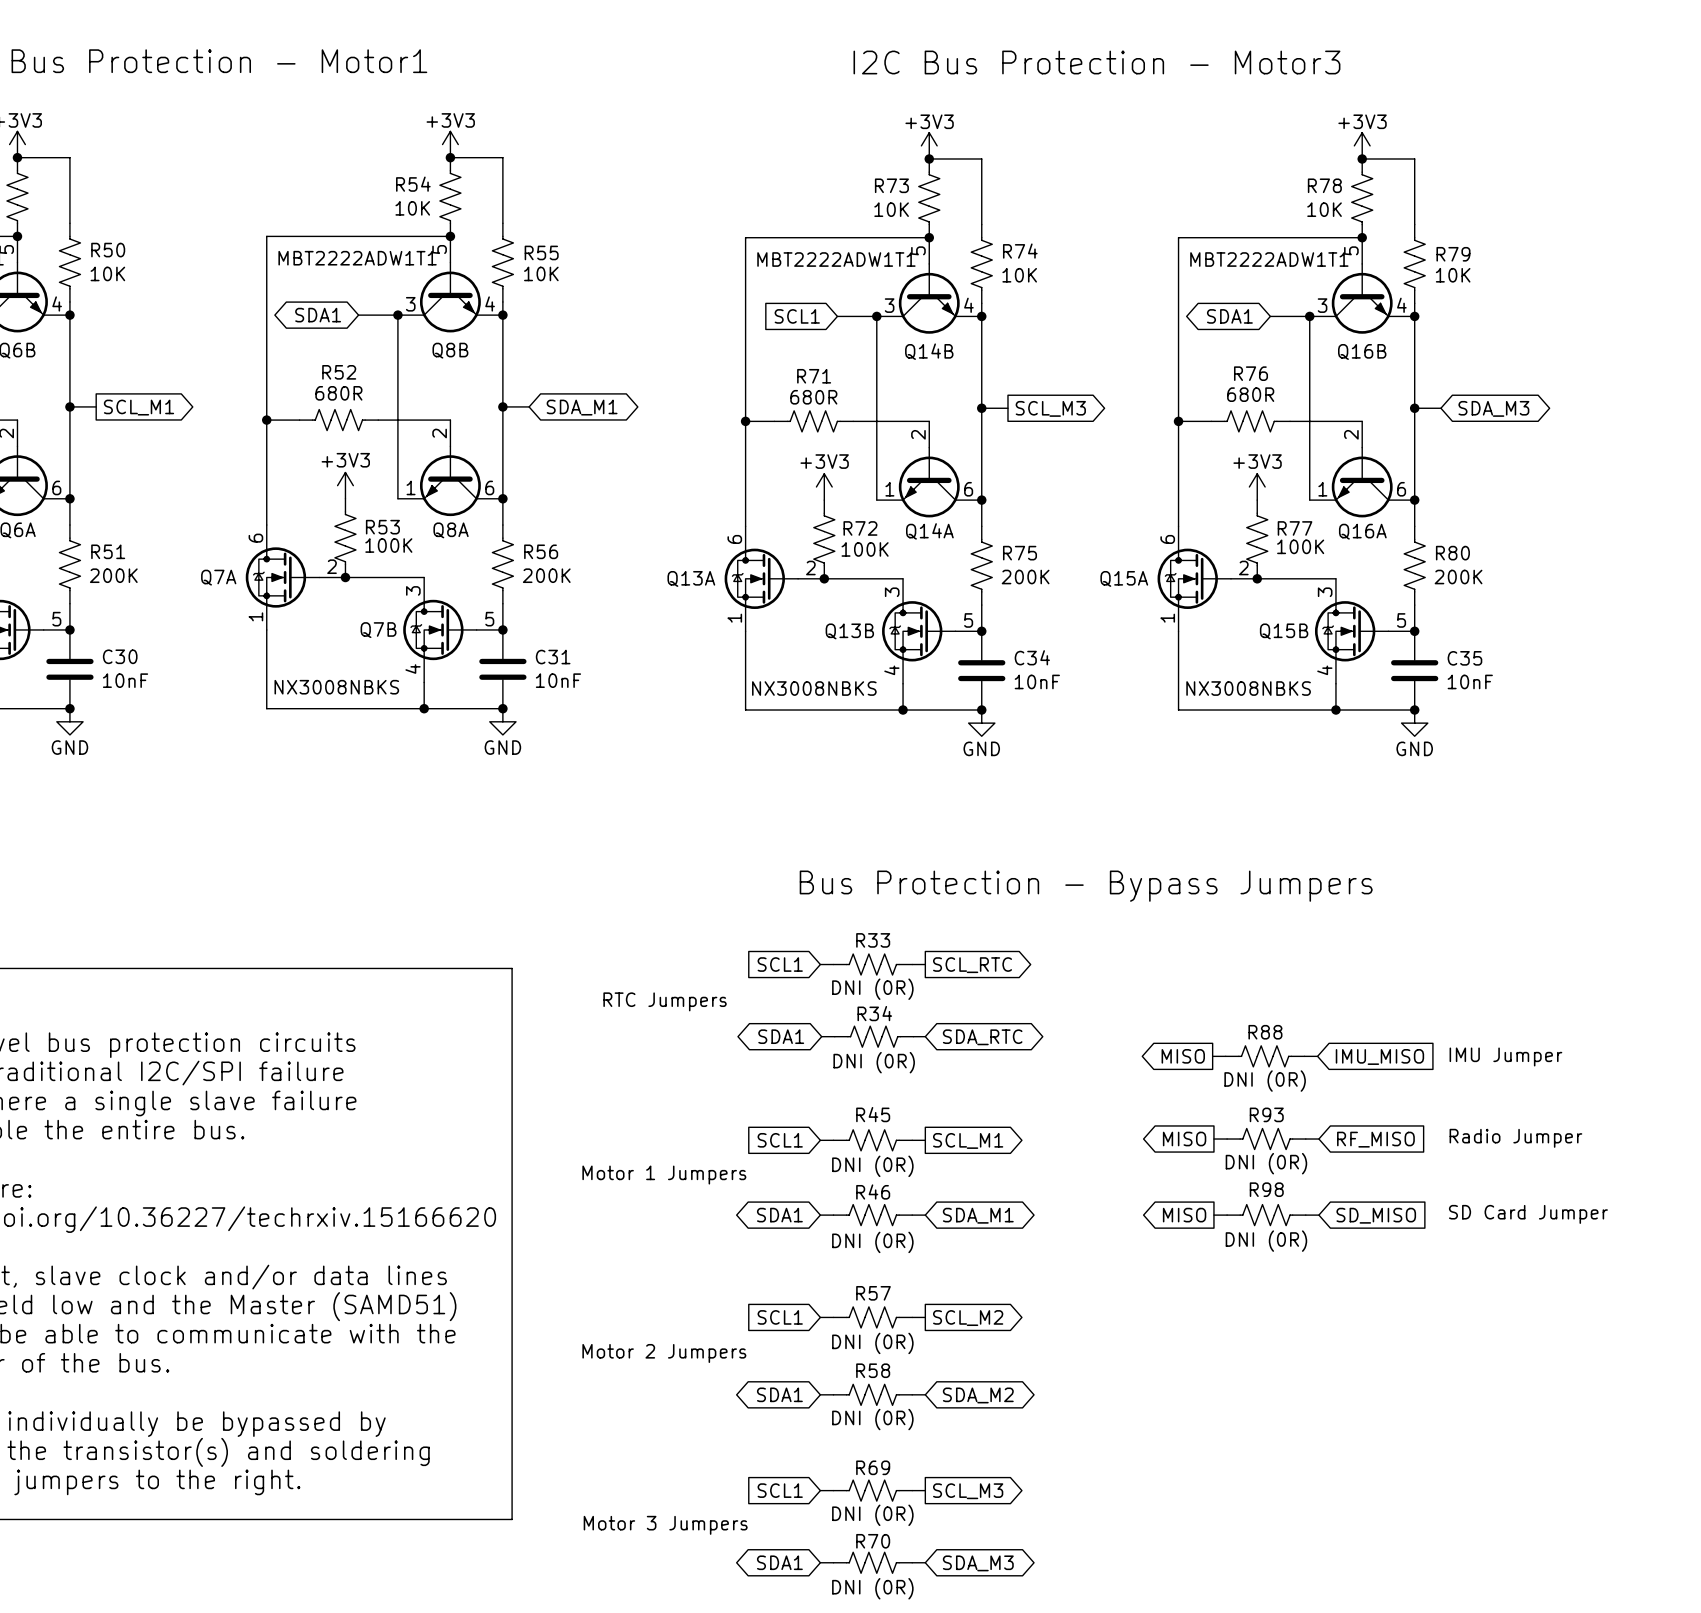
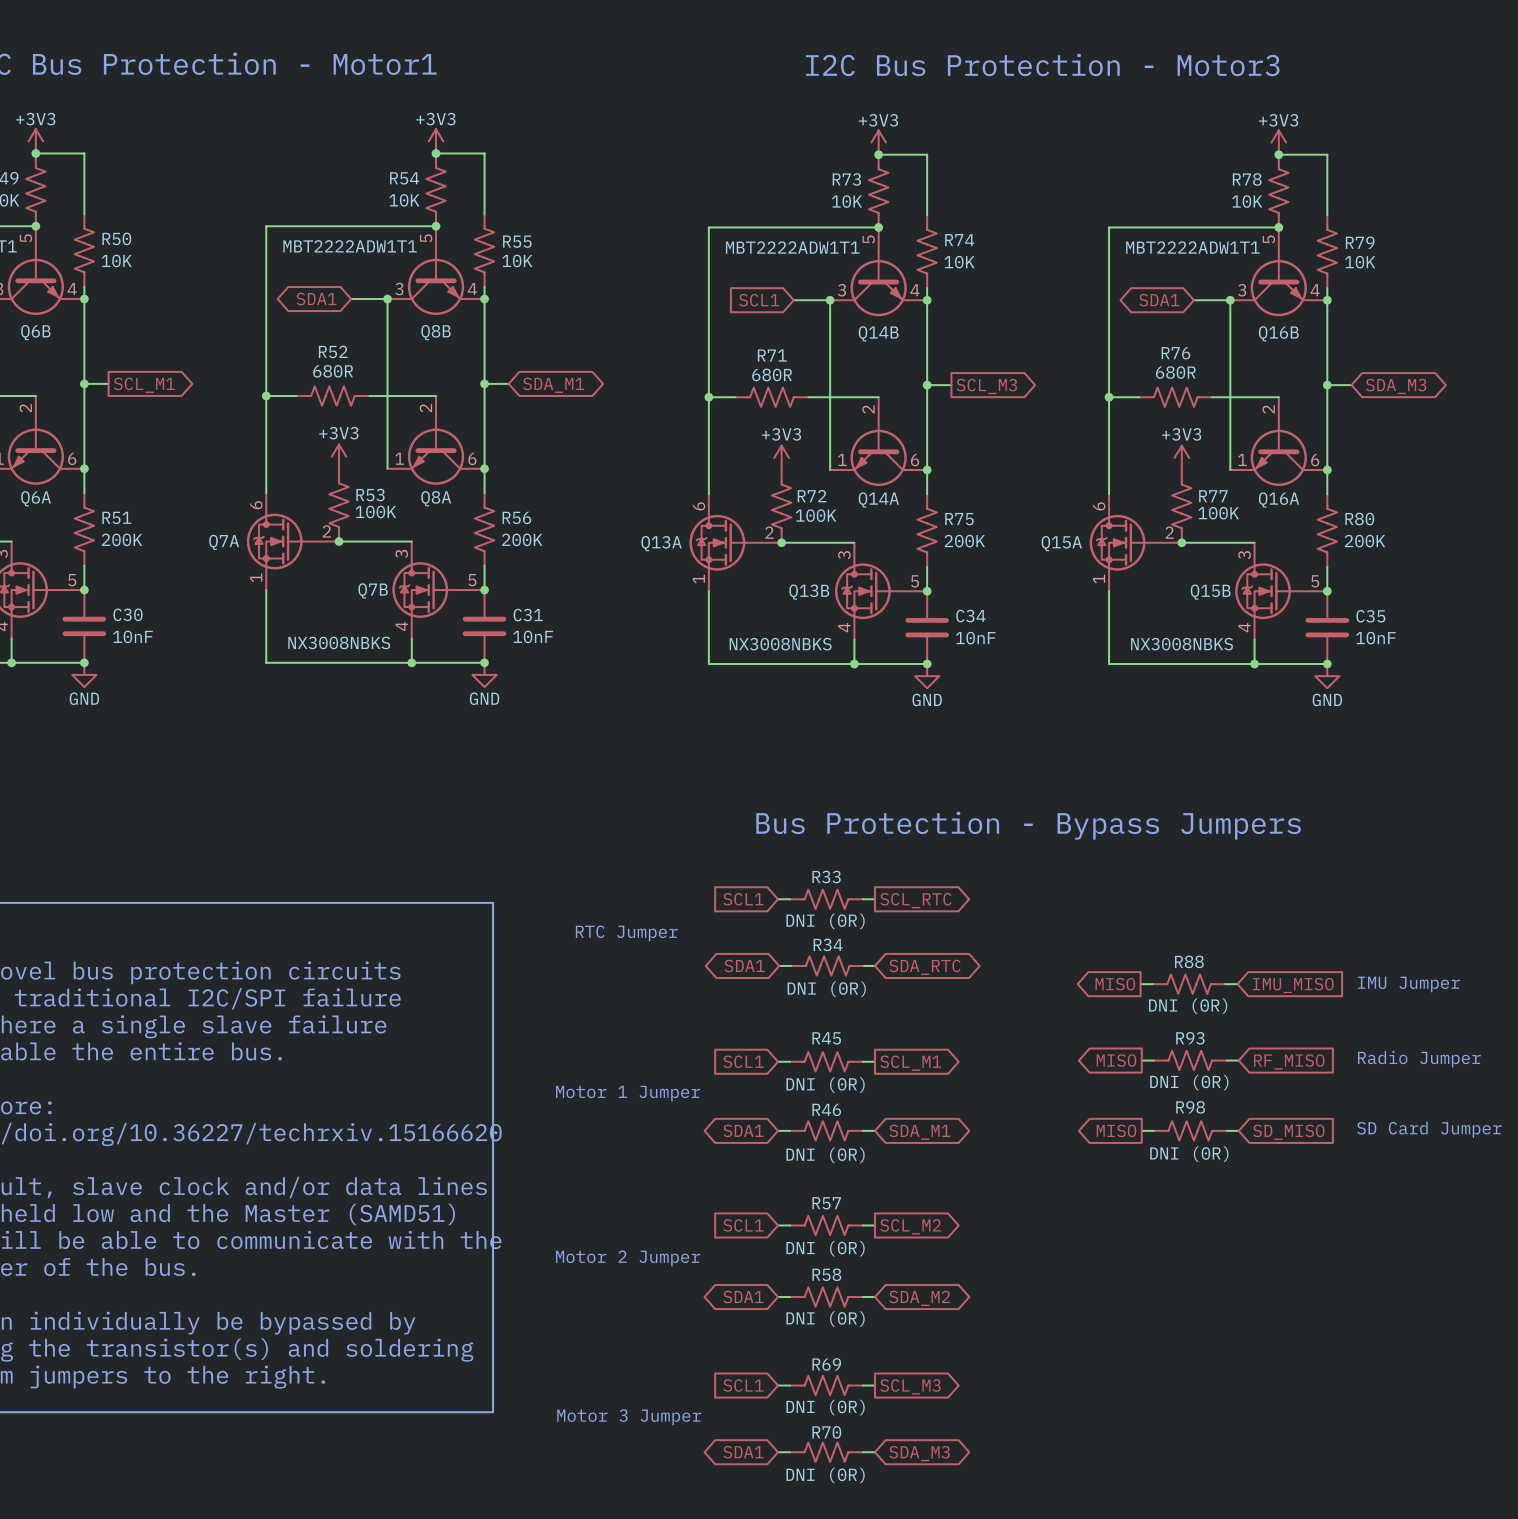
text: RTC Jumpers (665, 1001) -> RTC Jumper (626, 933)
text: Motor 1 Jumpers (664, 1175) -> Motor 1 Jumper (628, 1093)
text: Motor 2 Jumpers (664, 1353) -> Motor 2 Jumper (628, 1258)
text: Motor 3 Jumpers (665, 1525) -> Motor 3 Jumper (629, 1417)

